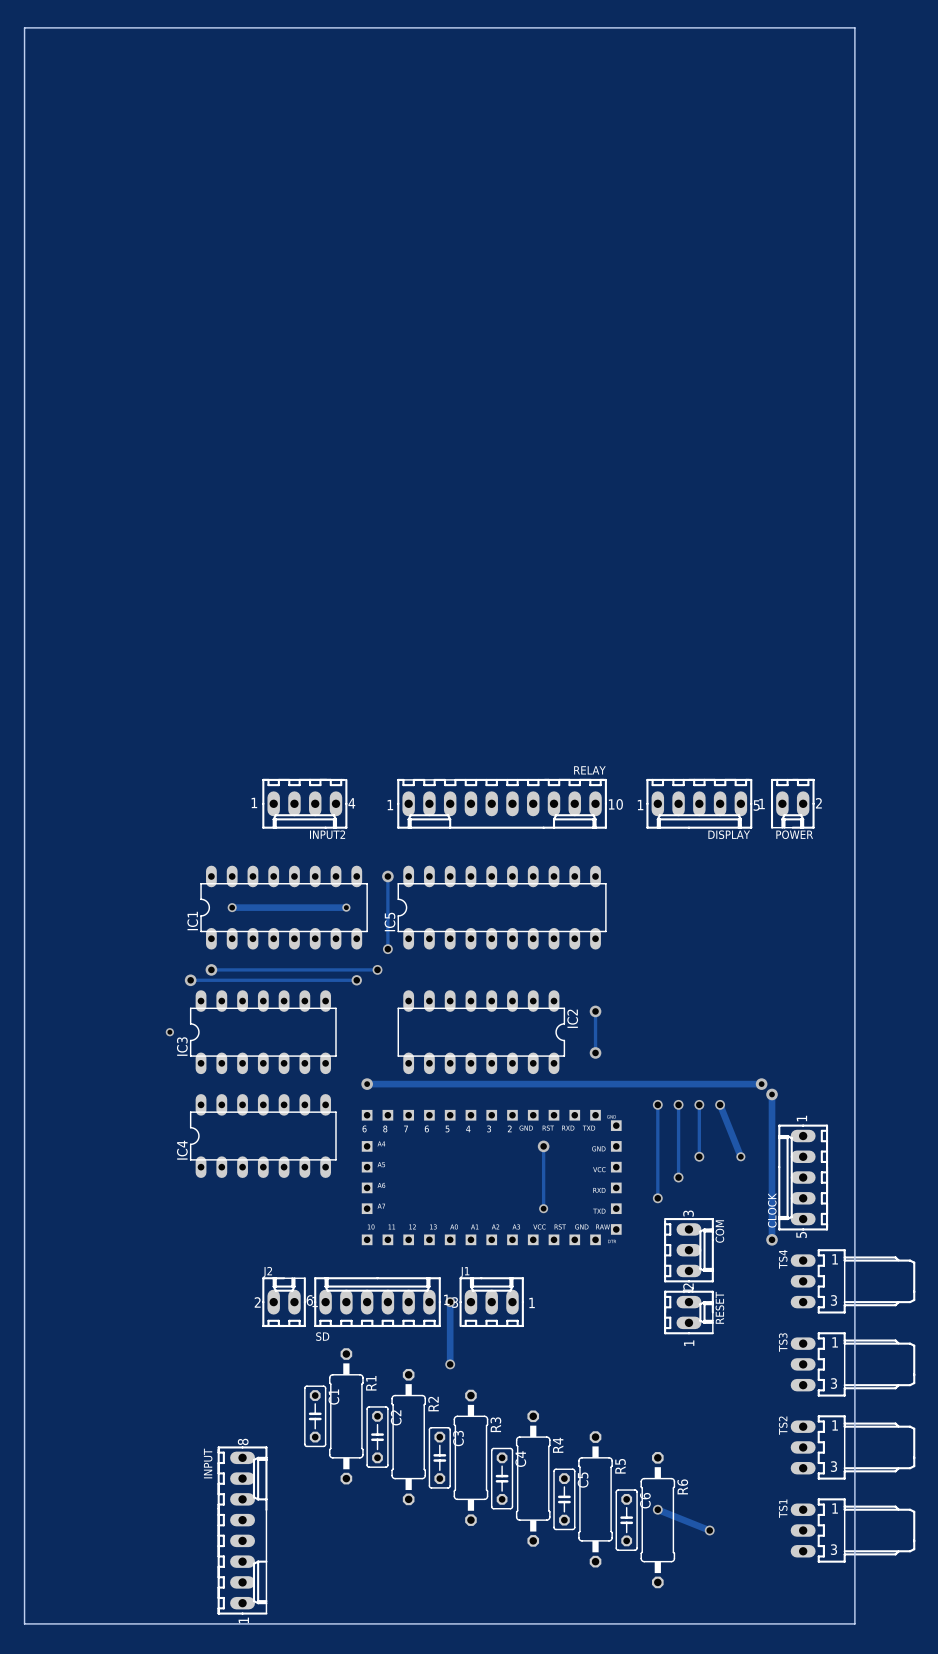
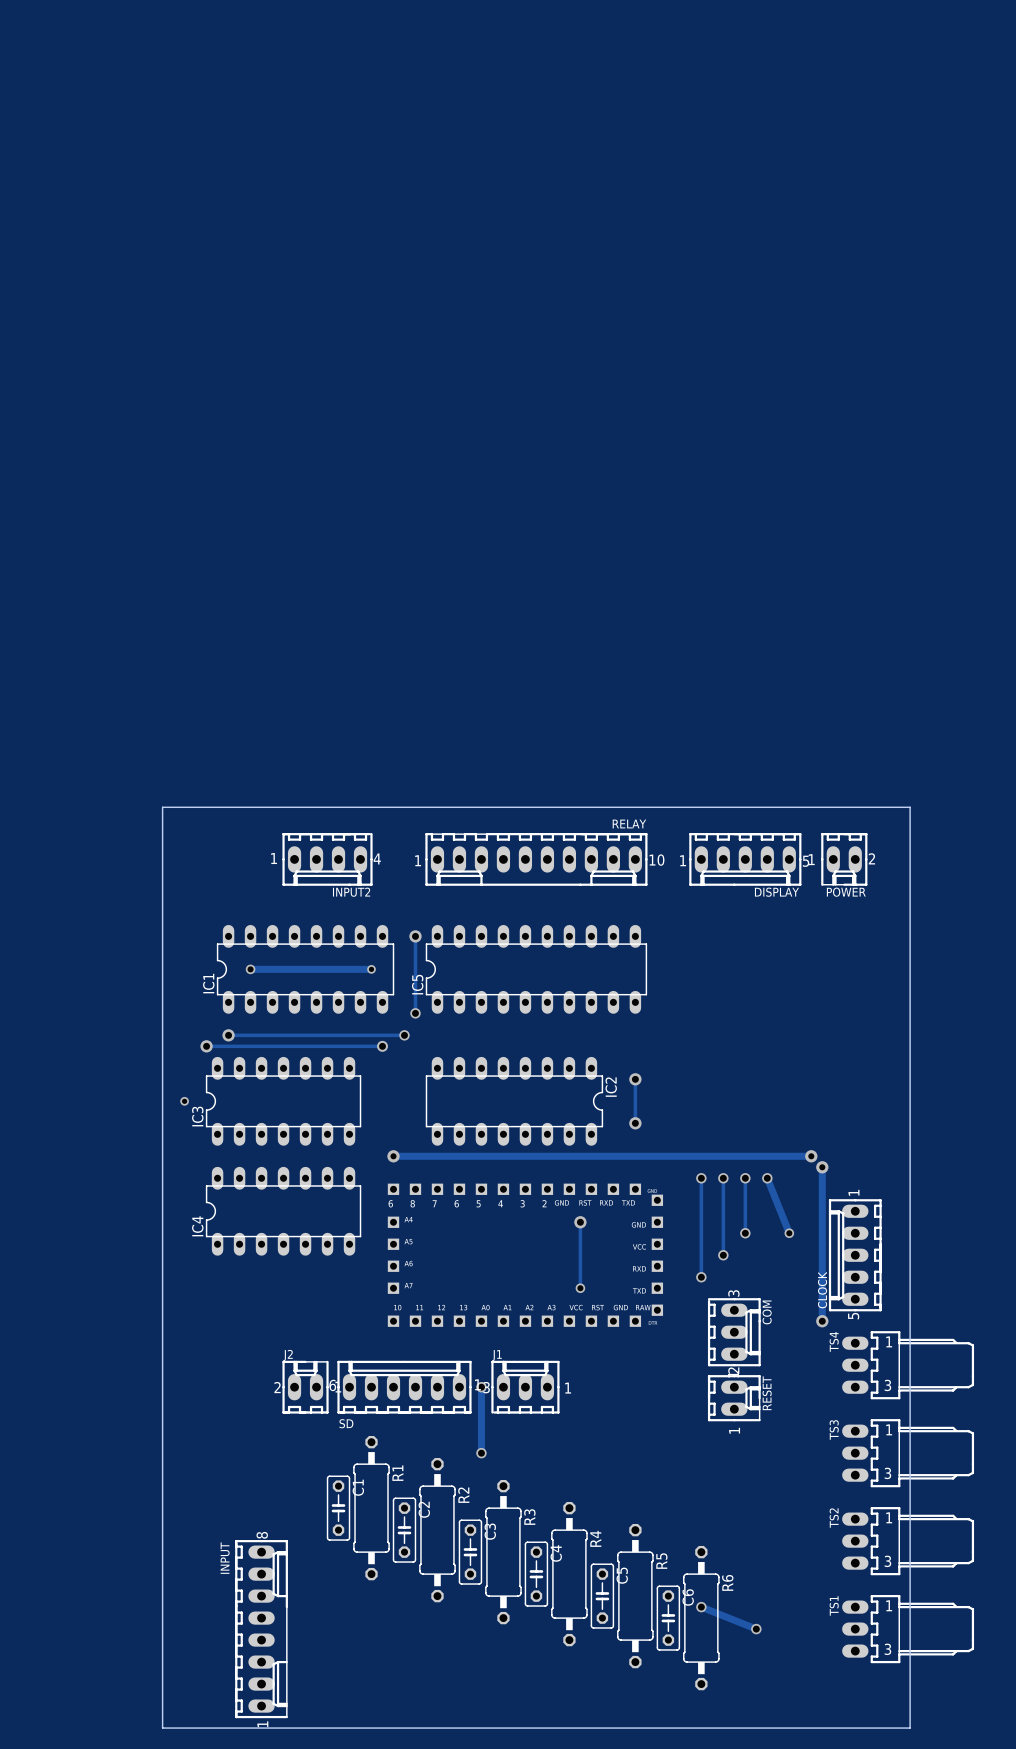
board edge: (854, 754) (854, 27) (24, 27) (24, 1623) (149, 1623) -> (910, 807) (162, 807) (162, 1728)

